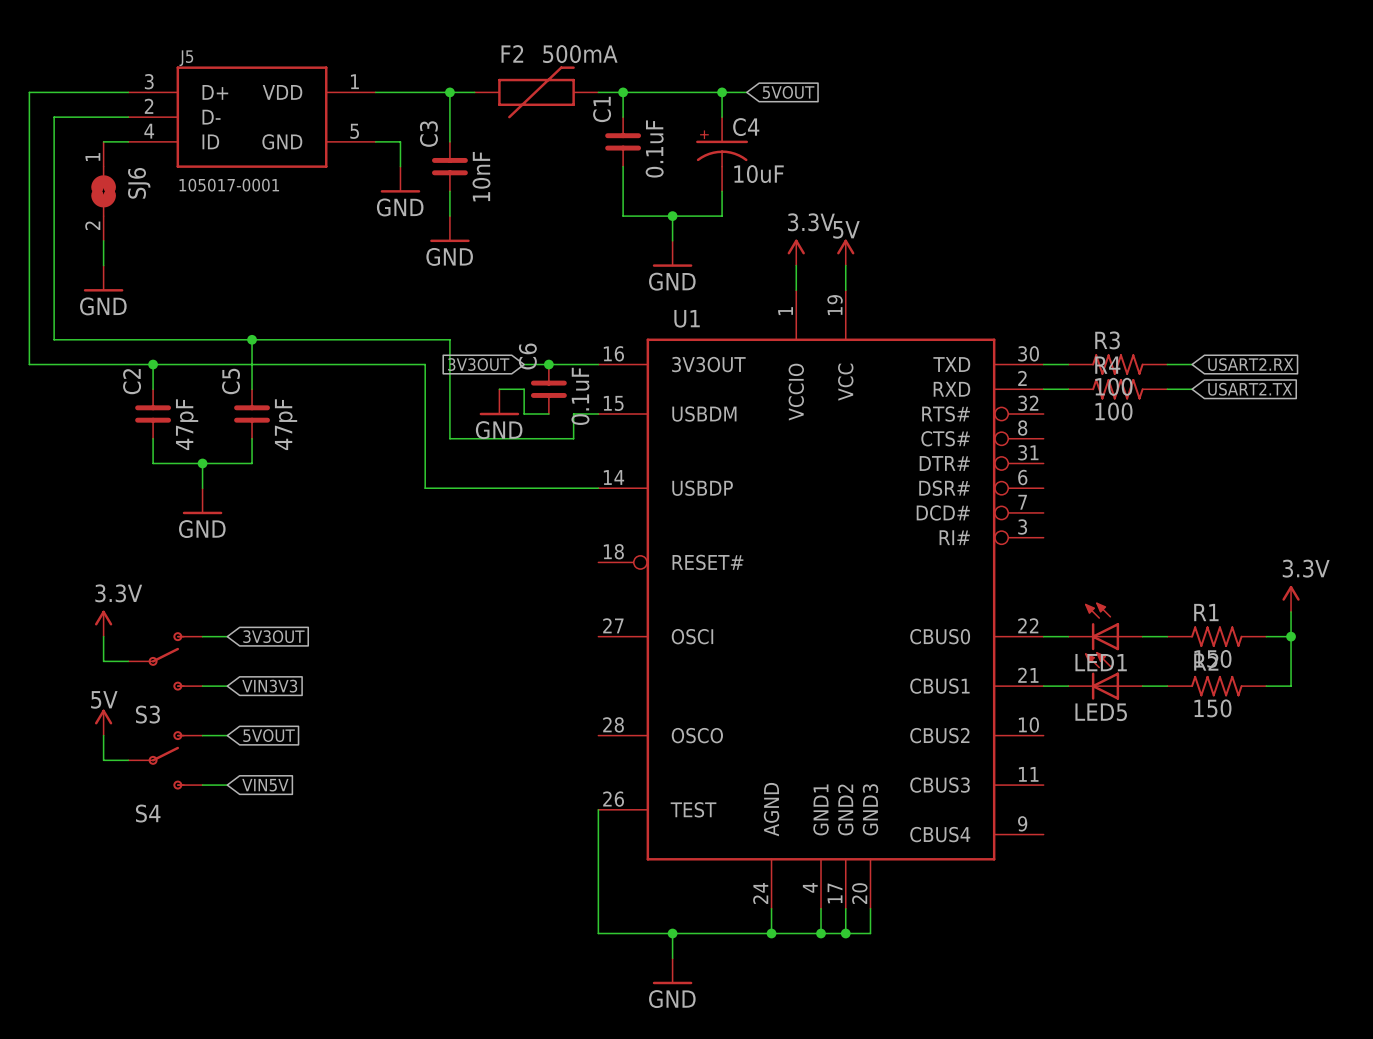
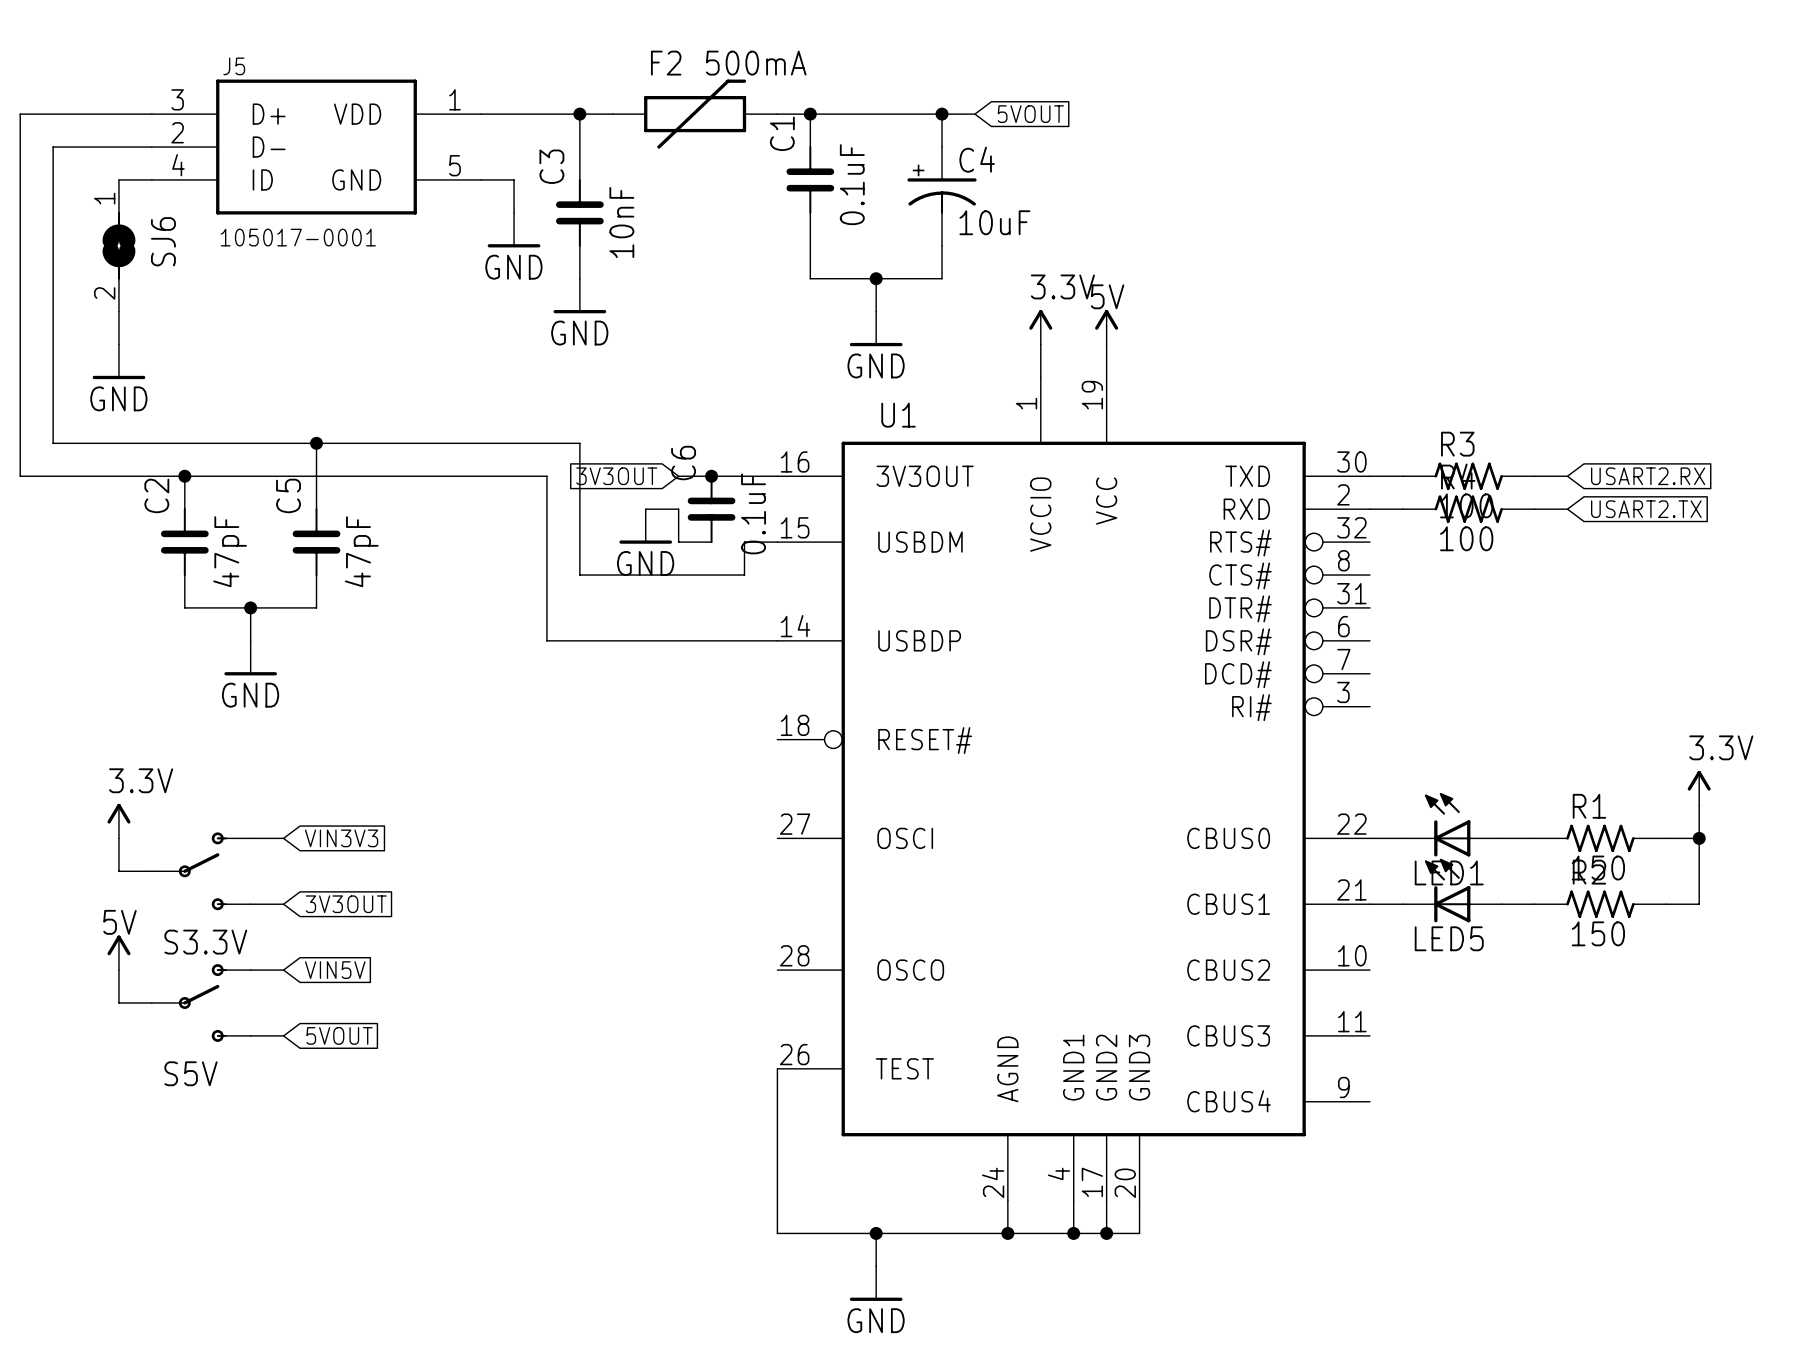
global label: 3V3OUT (273, 636) -> VIN3V3 (341, 838)
global label: VIN3V3 (269, 686) -> 3V3OUT (346, 904)
S3 name: S3 (147, 714) -> S3.3V (205, 942)
global label: 5VOUT (269, 735) -> VIN5V (335, 970)
global label: VIN5V (265, 785) -> 5VOUT (339, 1035)
S4 name: S4 (148, 813) -> S5V (190, 1073)

